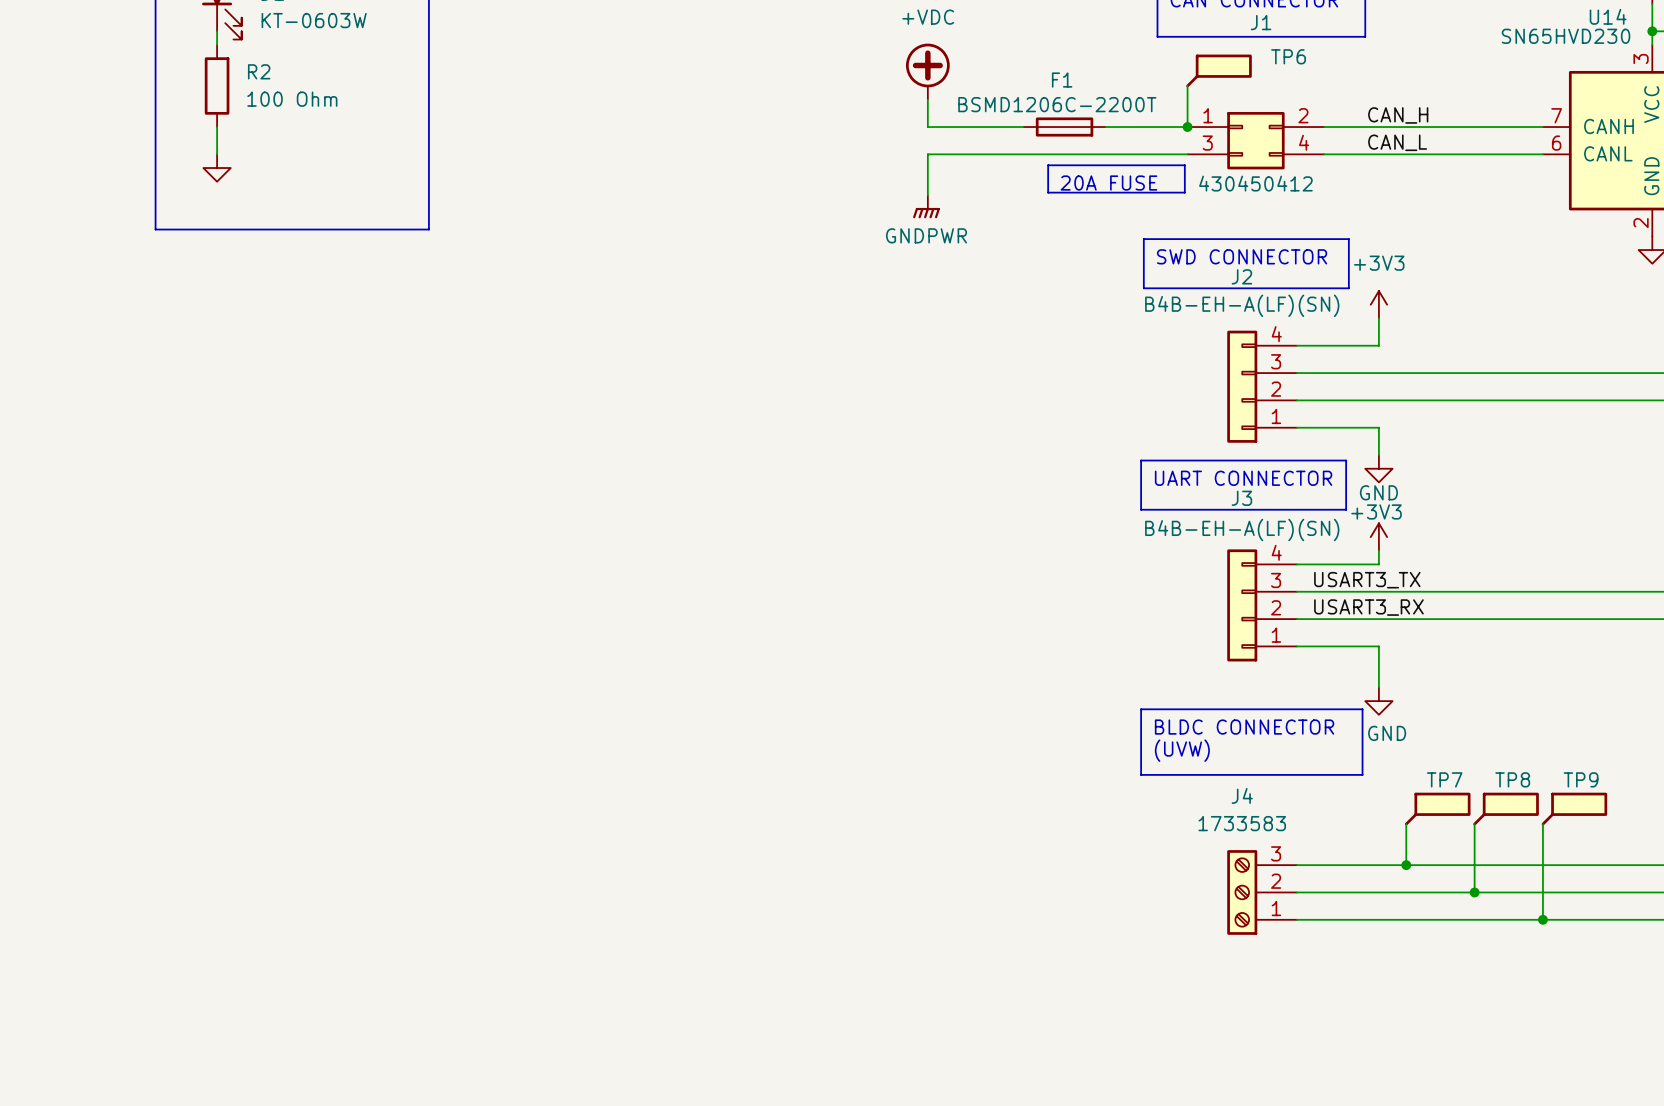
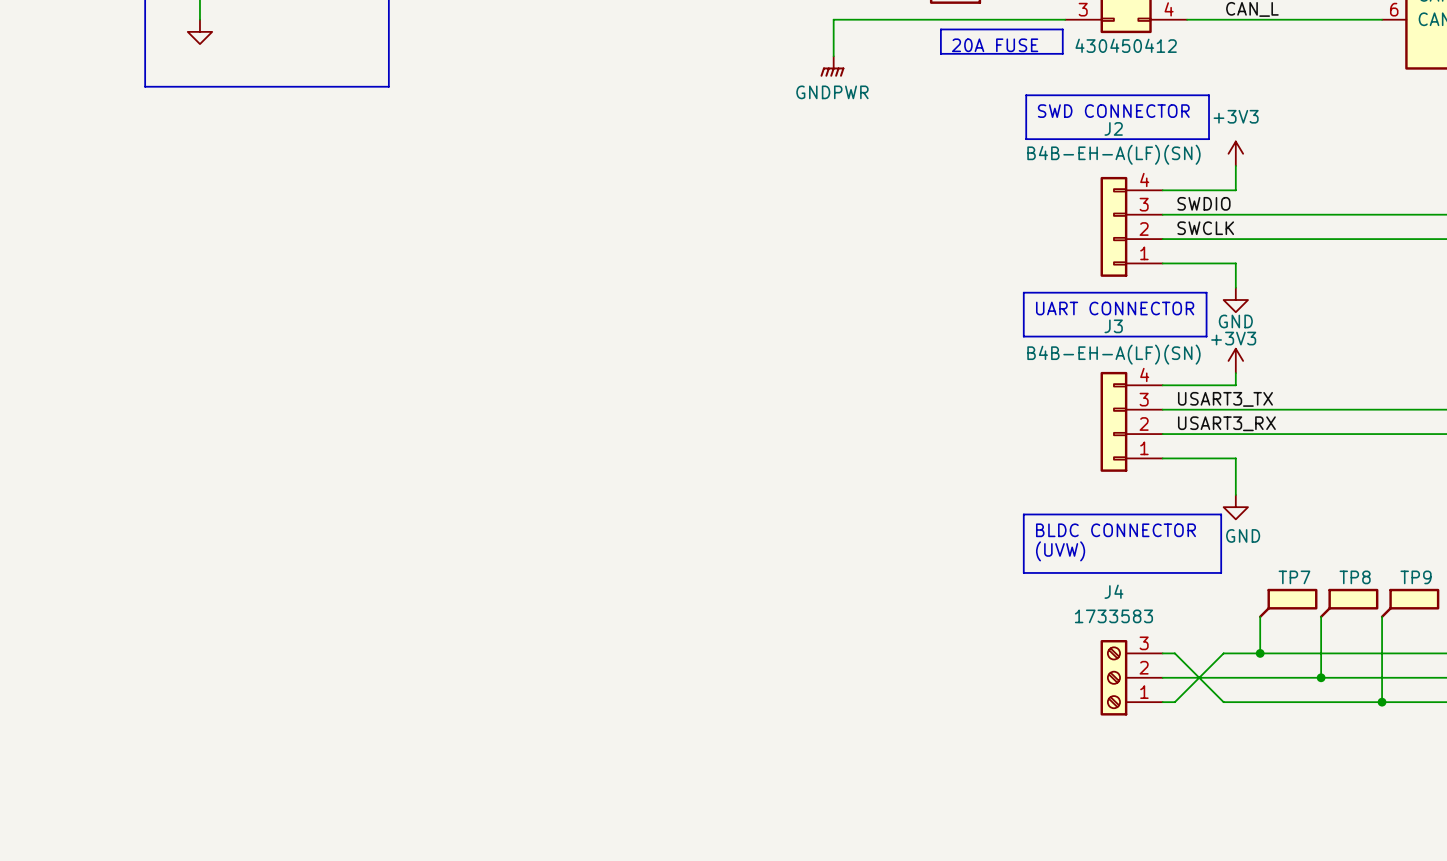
label: none -> SWDIO (1203, 203)
label: none -> SWCLK (1205, 228)
wire: (1310, 865) (1365, 865) -> (1174, 653) (1223, 702)
wire: (1310, 919) (1365, 919) -> (1174, 702) (1223, 653)

